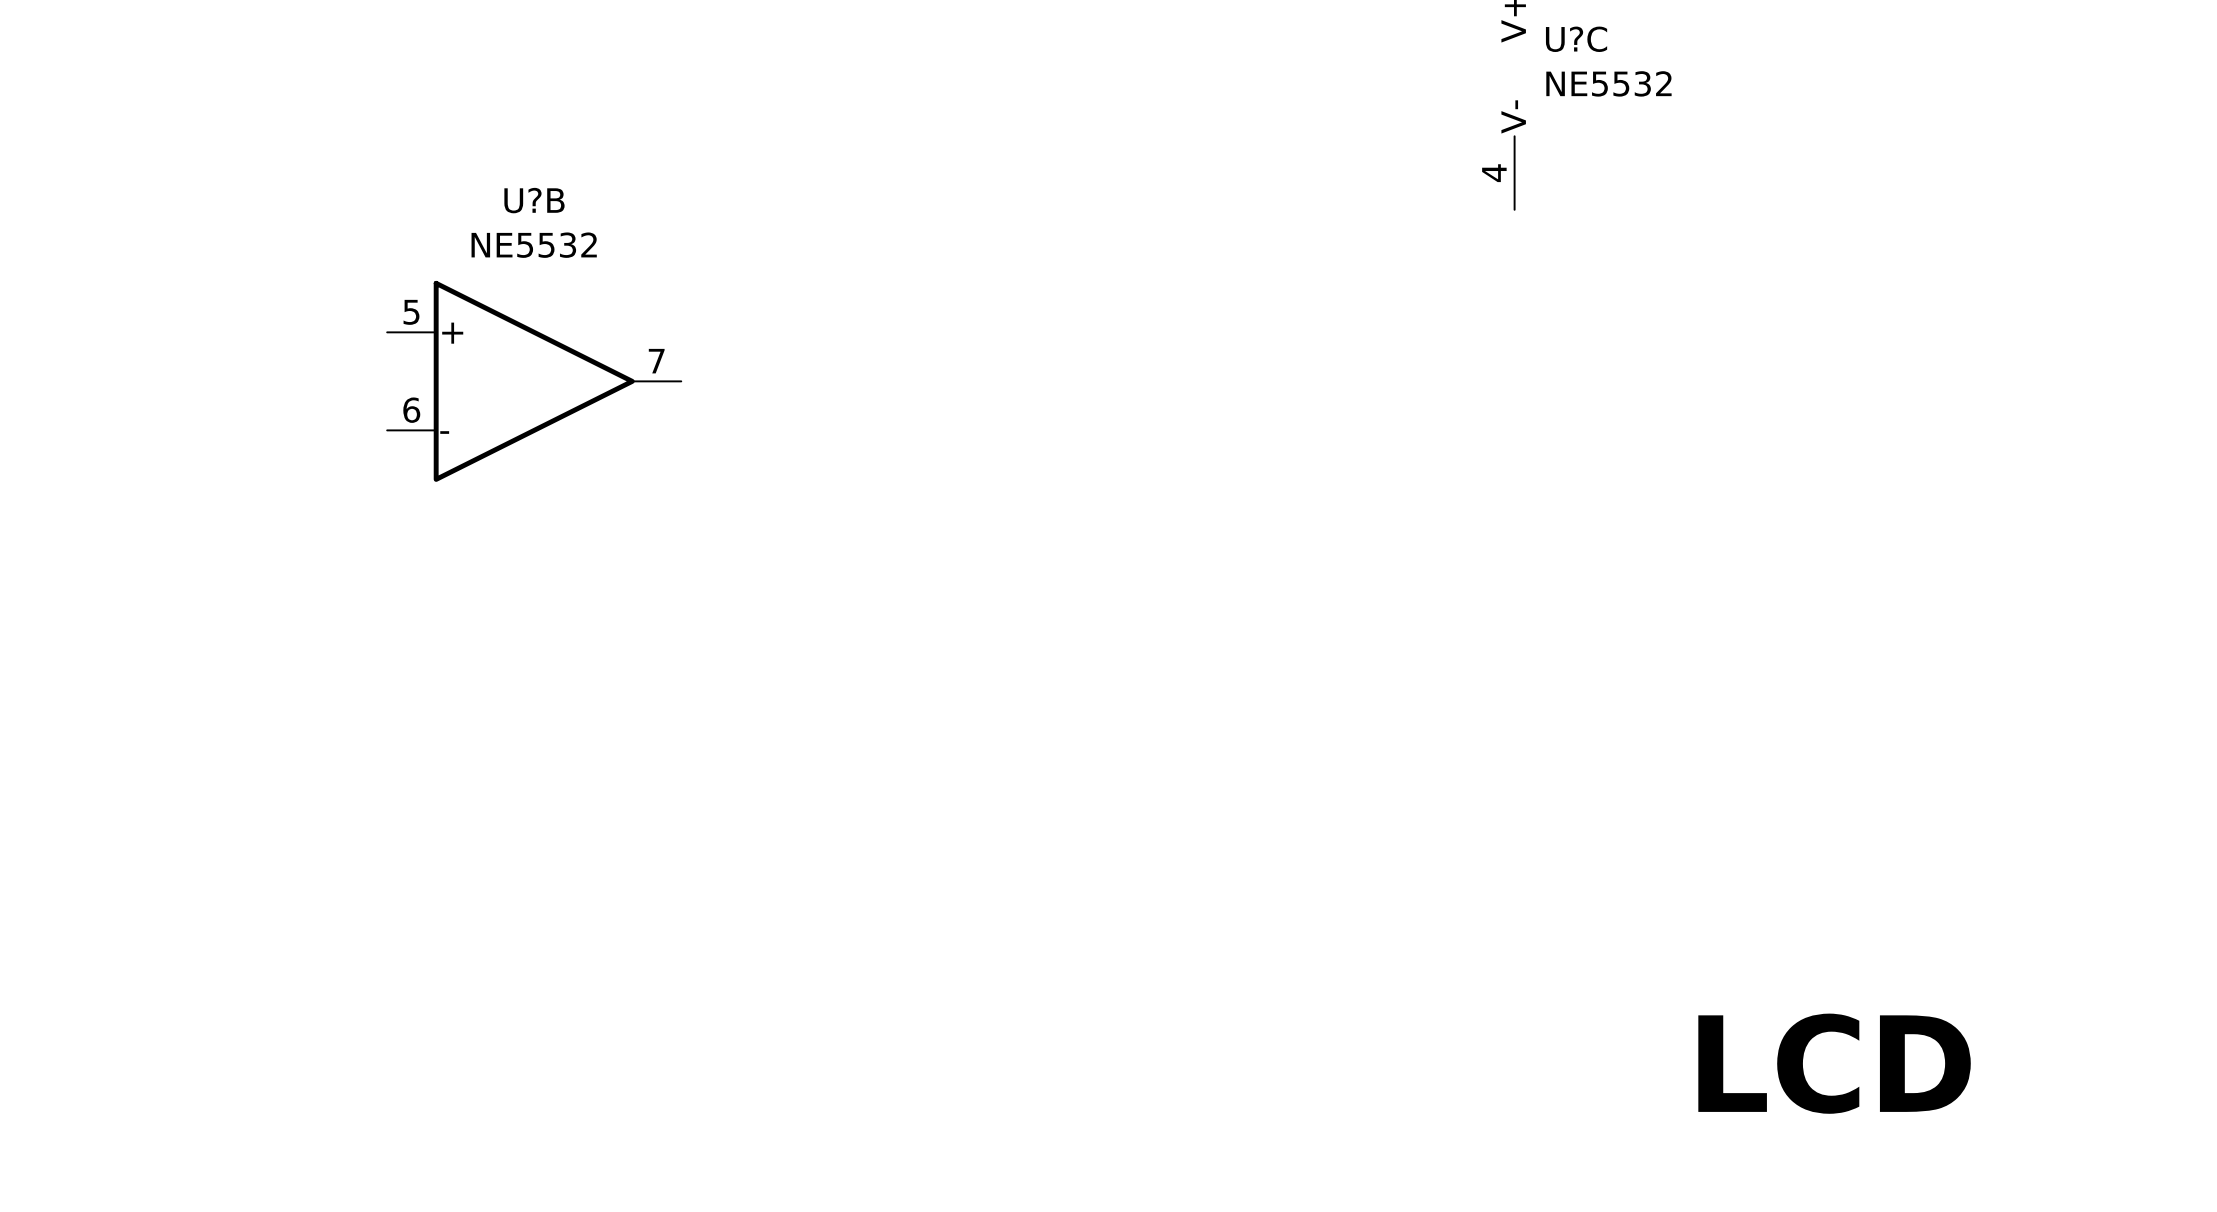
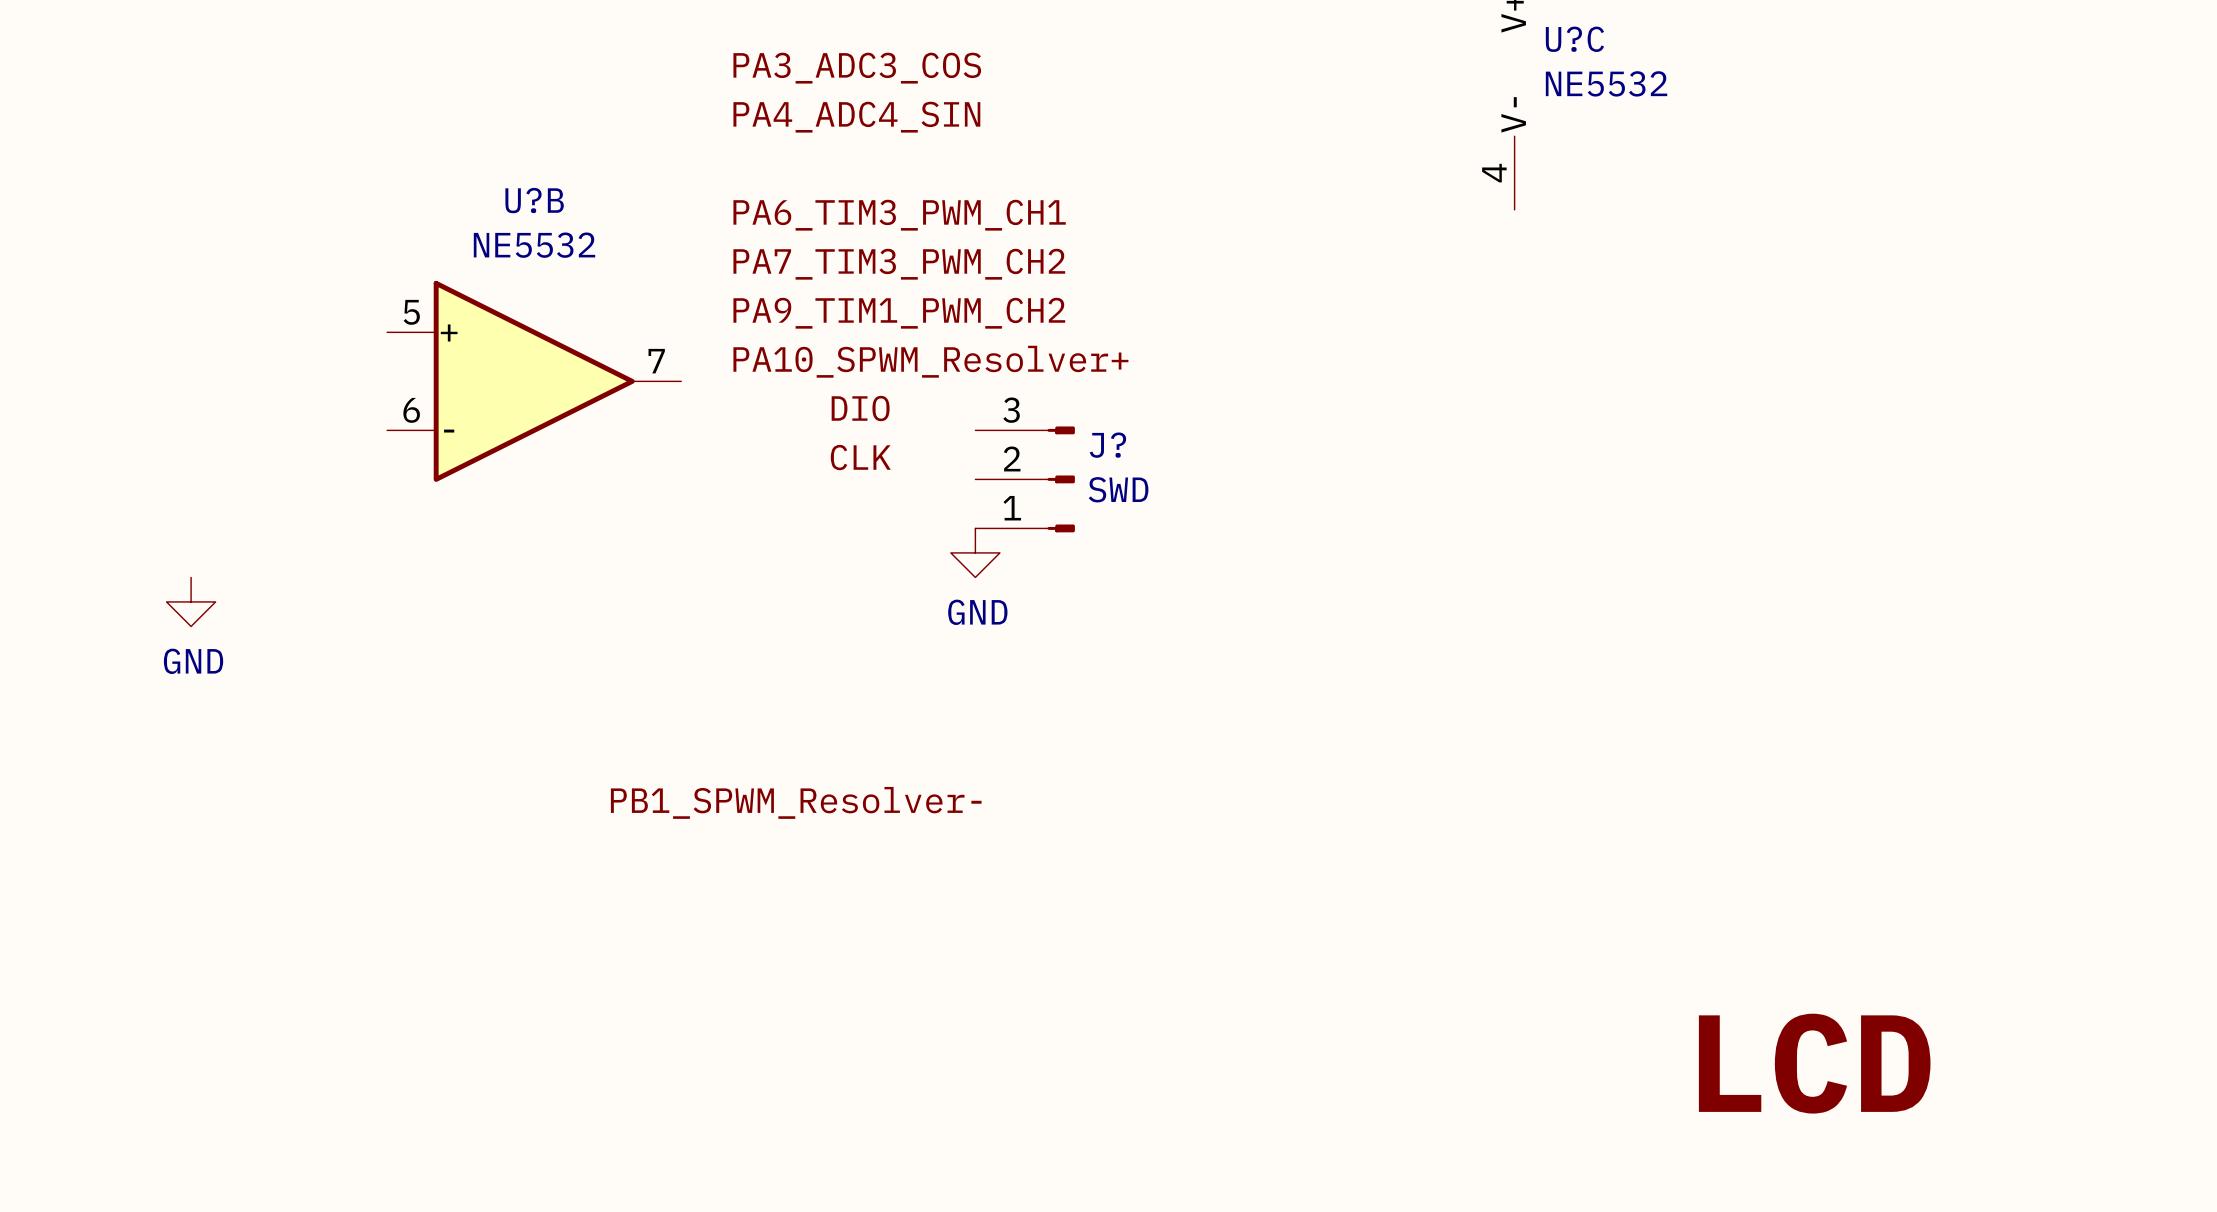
label: none -> PA3_ADC3_COS (857, 68)
label: none -> PA4_ADC4_SIN (856, 117)
label: none -> PA6_TIM3_PWM_CH1 (899, 215)
label: none -> PA7_TIM3_PWM_CH2 (899, 264)
label: none -> PA9_TIM1_PWM_CH2 (899, 313)
label: none -> PA10_SPWM_Resolver+ (930, 361)
label: none -> DIO (860, 408)
label: none -> CLK (860, 457)
J?: none -> SWD (1025, 479)
power symbol: none -> GND (975, 552)
power symbol: none -> GND (191, 601)
label: none -> PB1_SPWM_Resolver- (796, 802)

